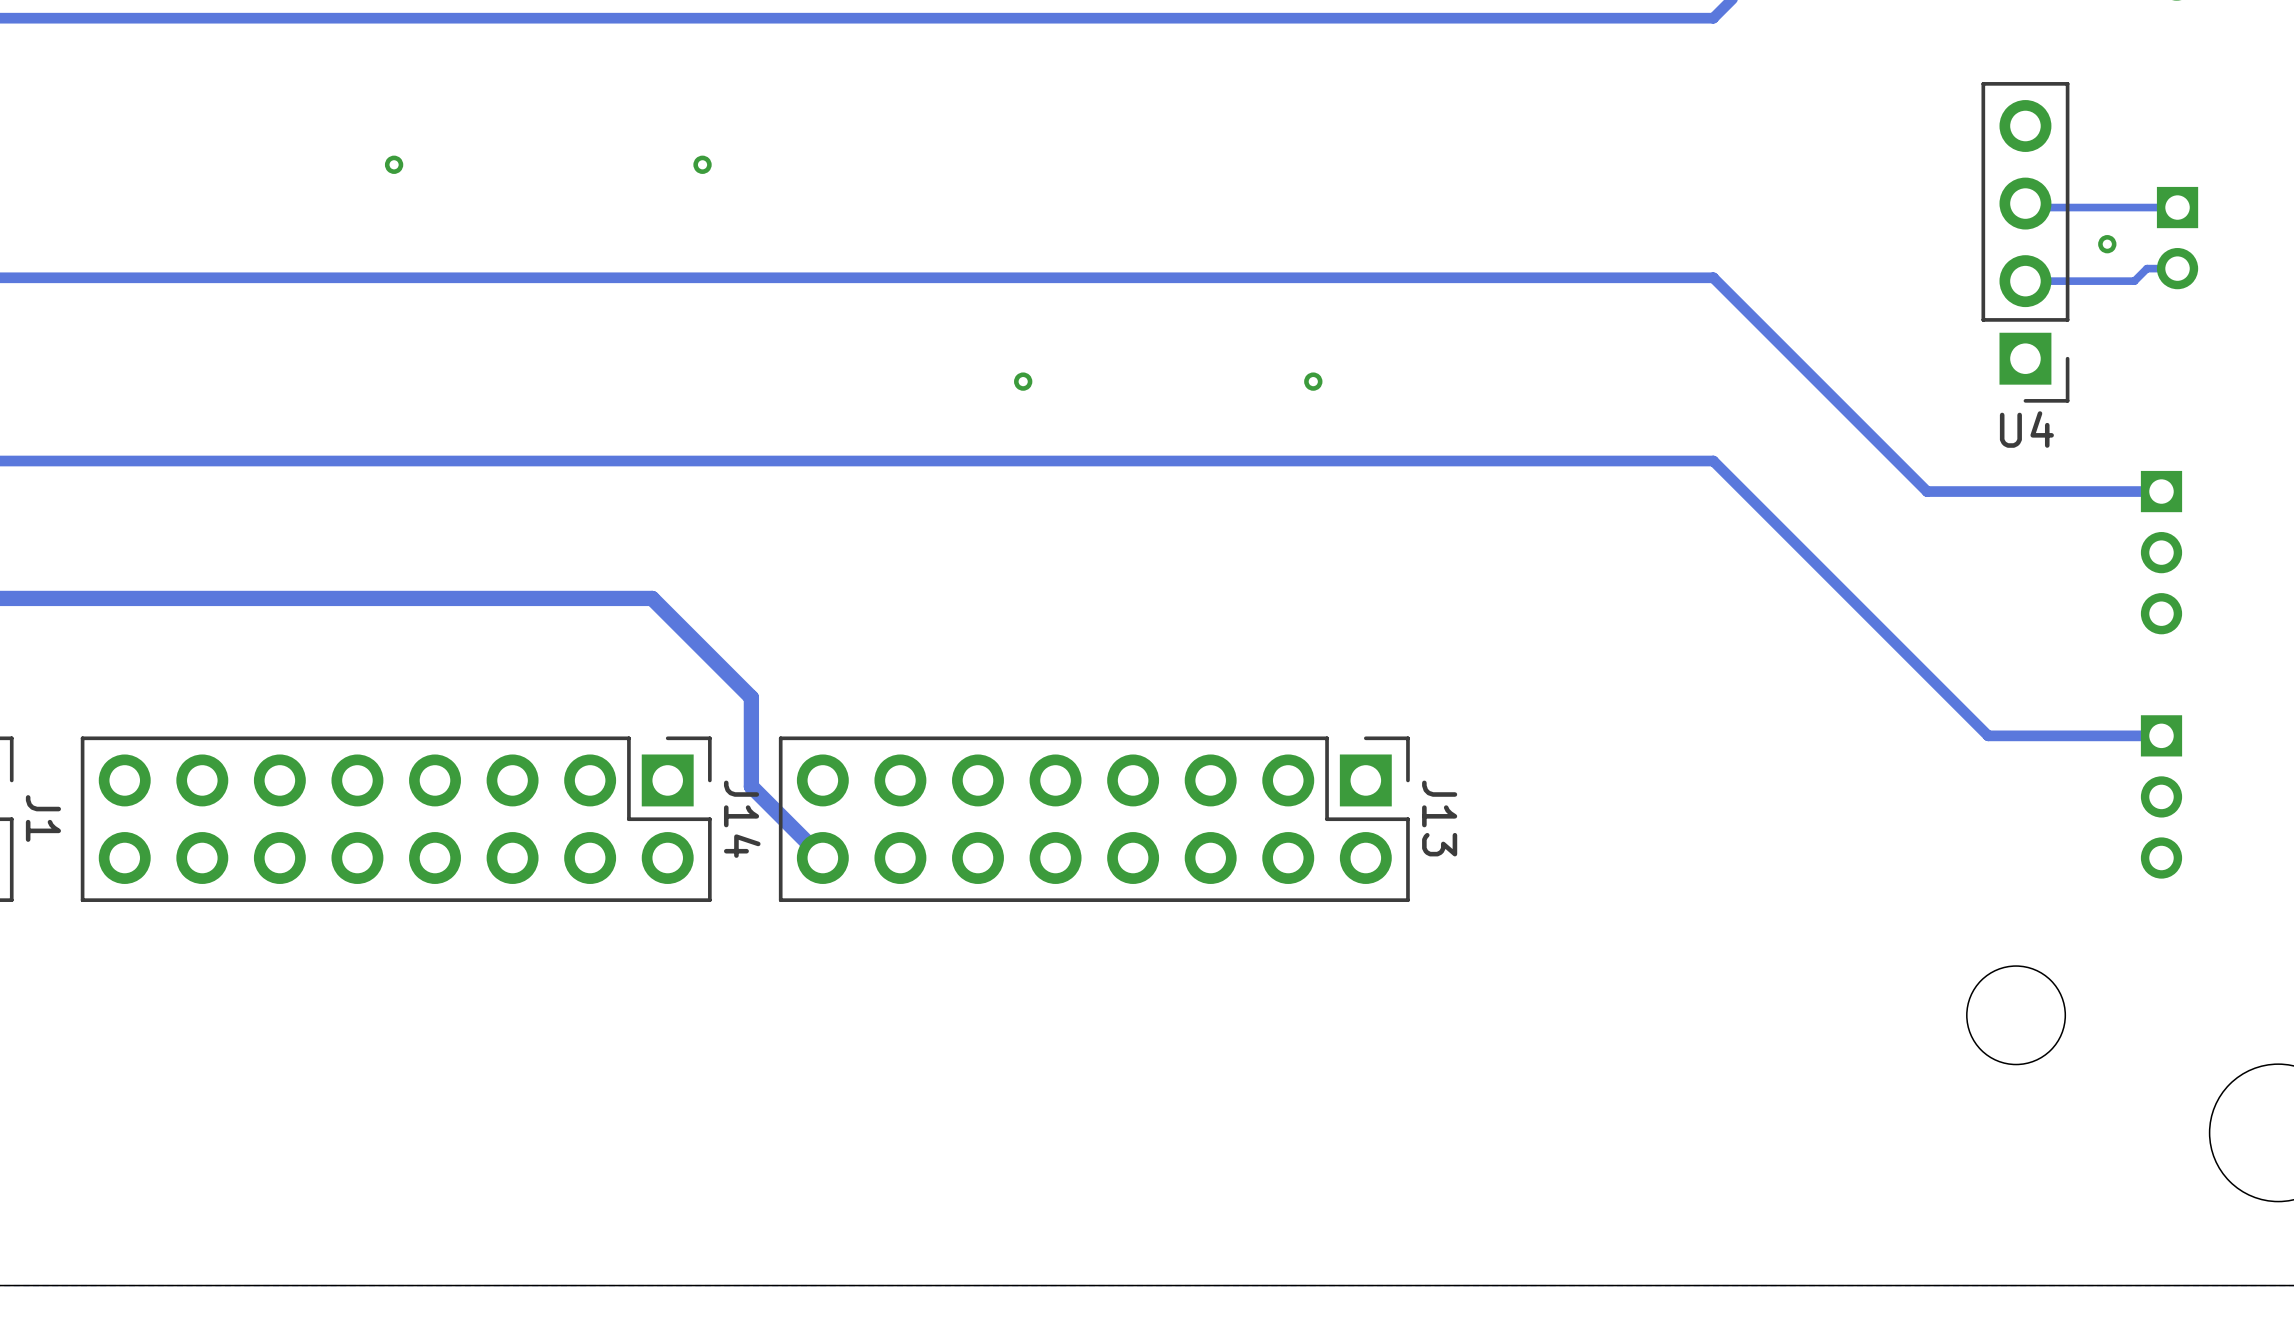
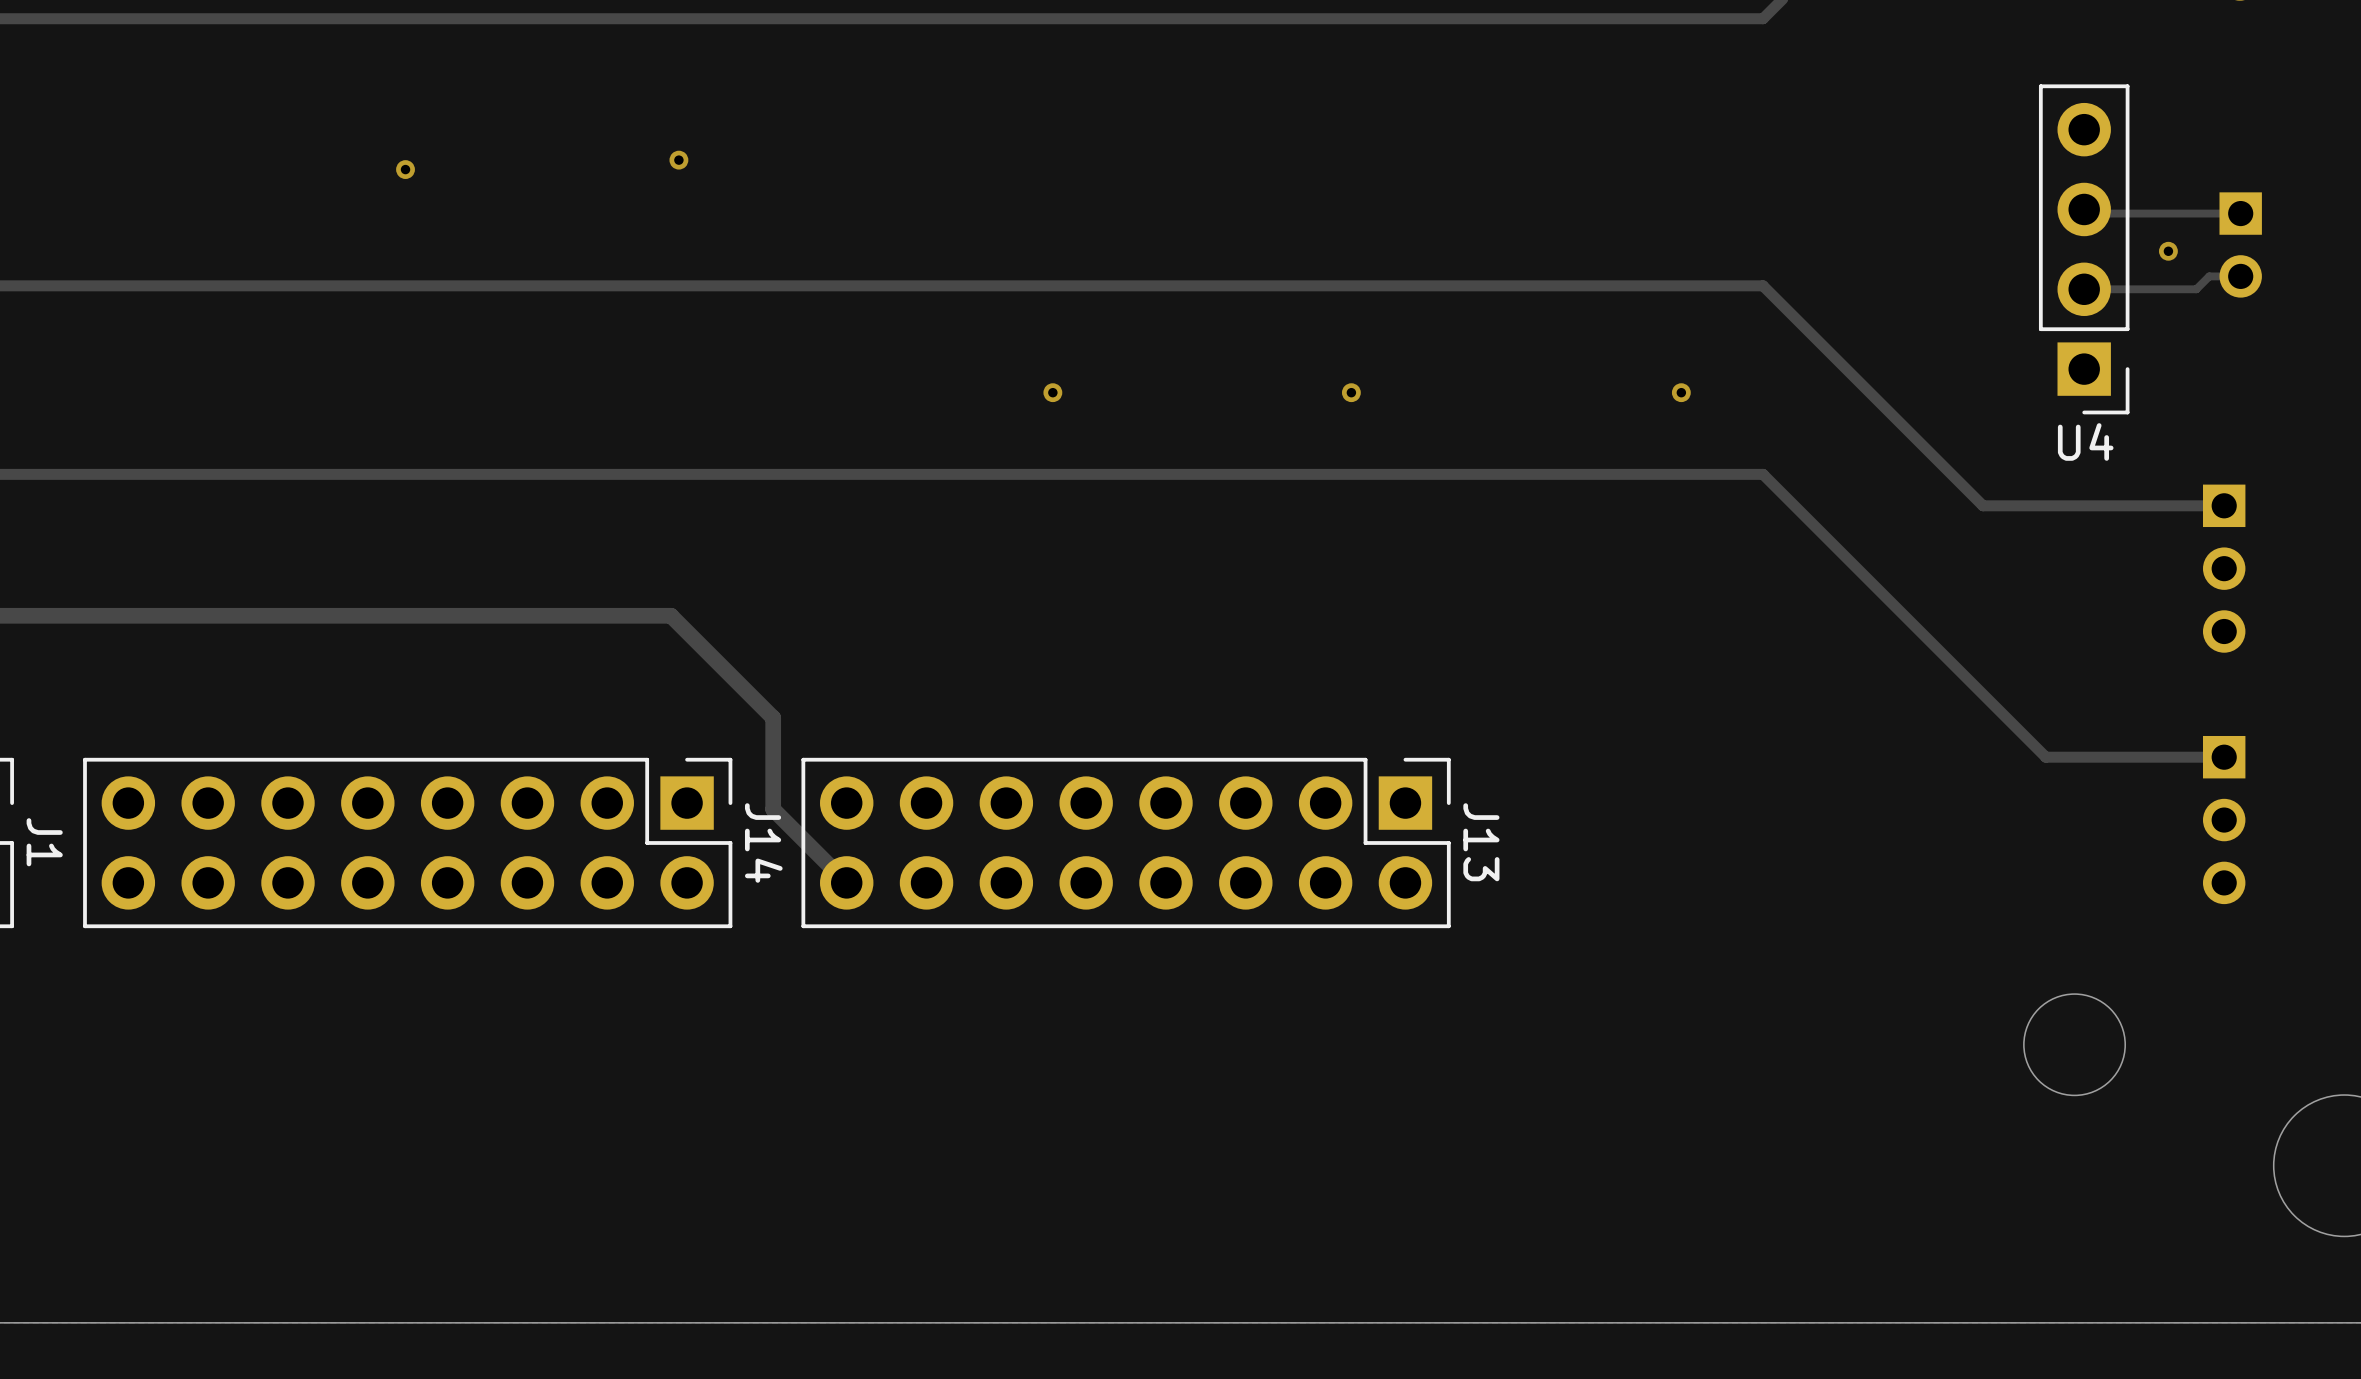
via position: (702, 164) -> (678, 160)
via: none -> (1681, 392)

